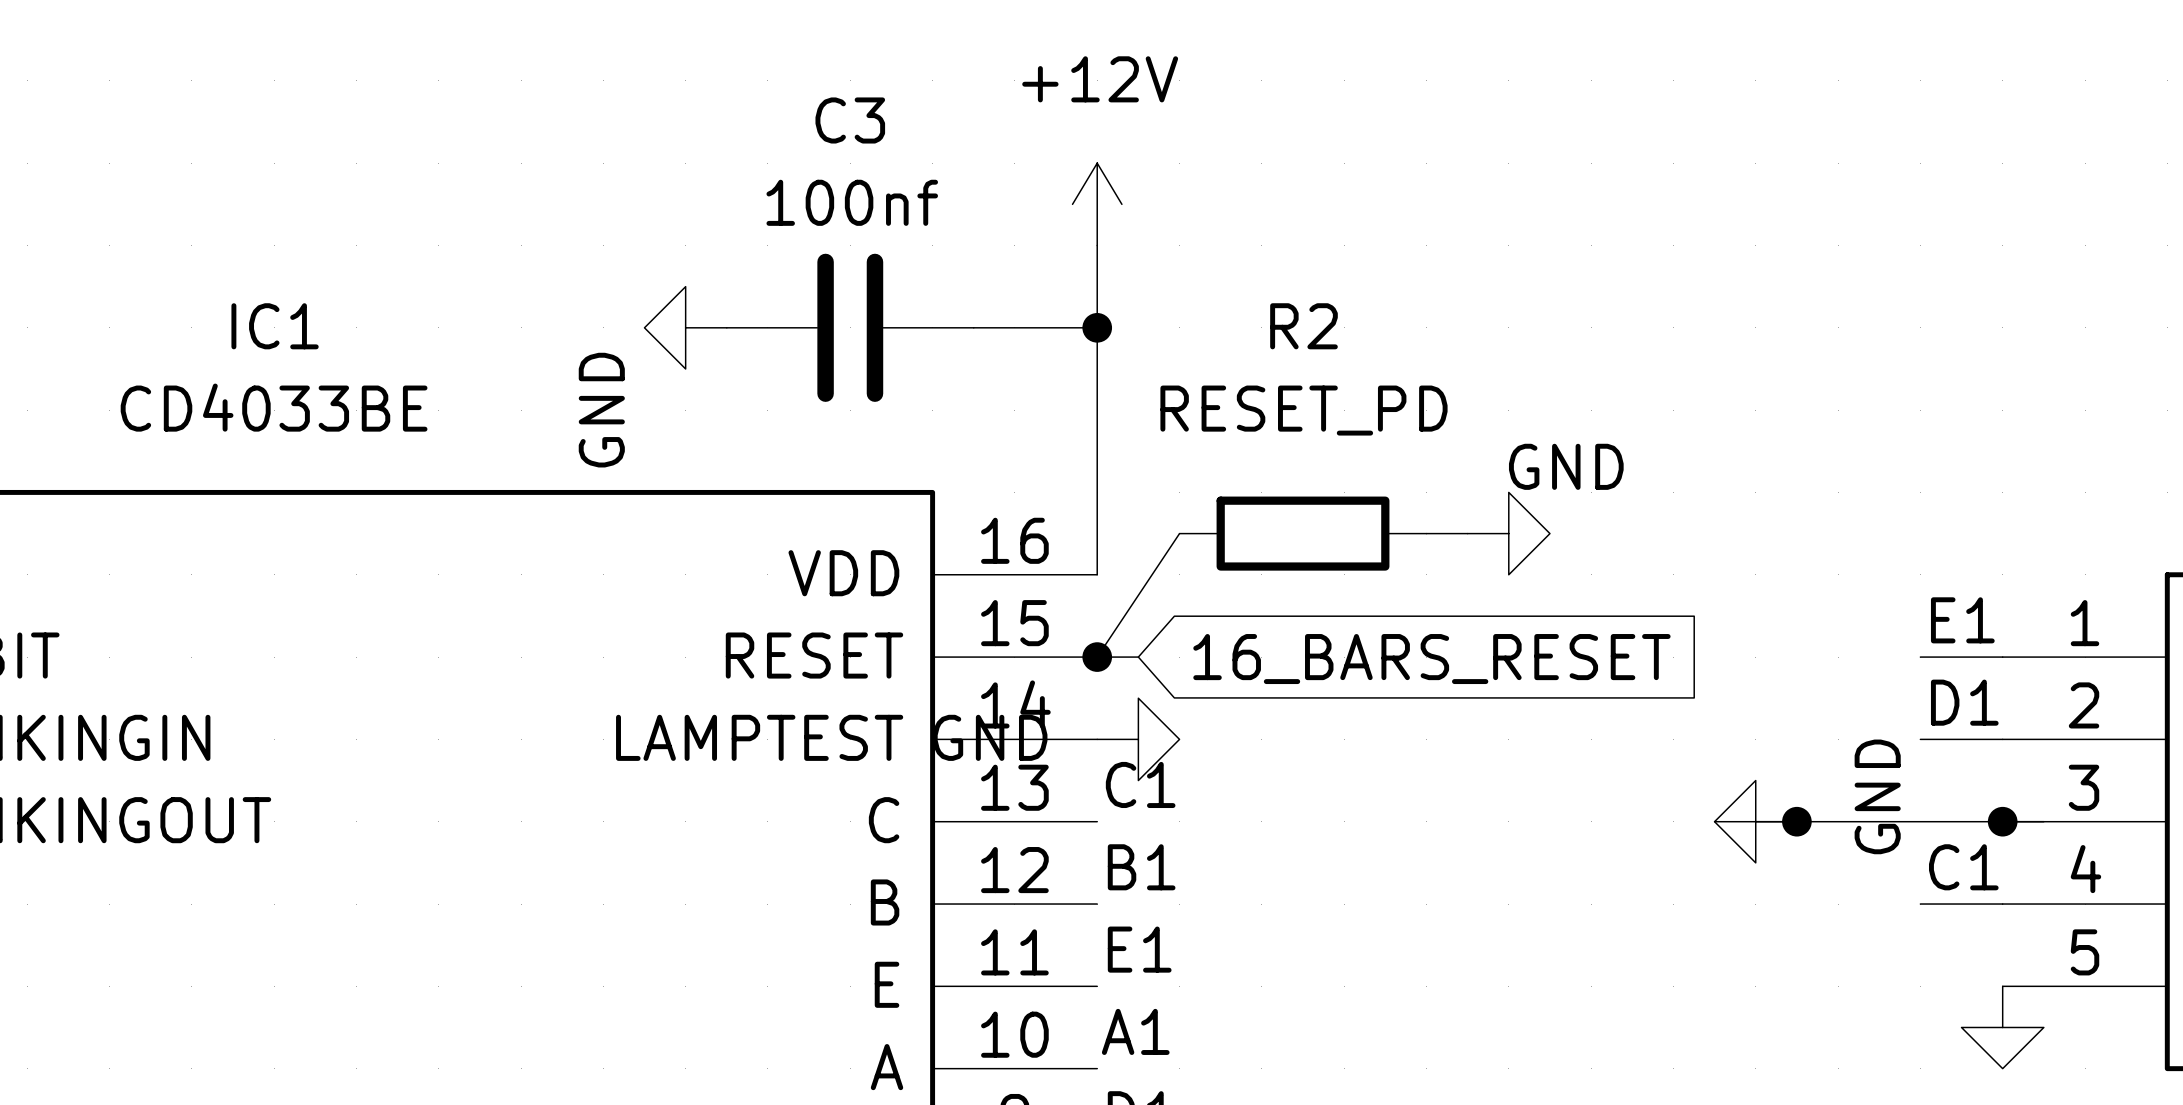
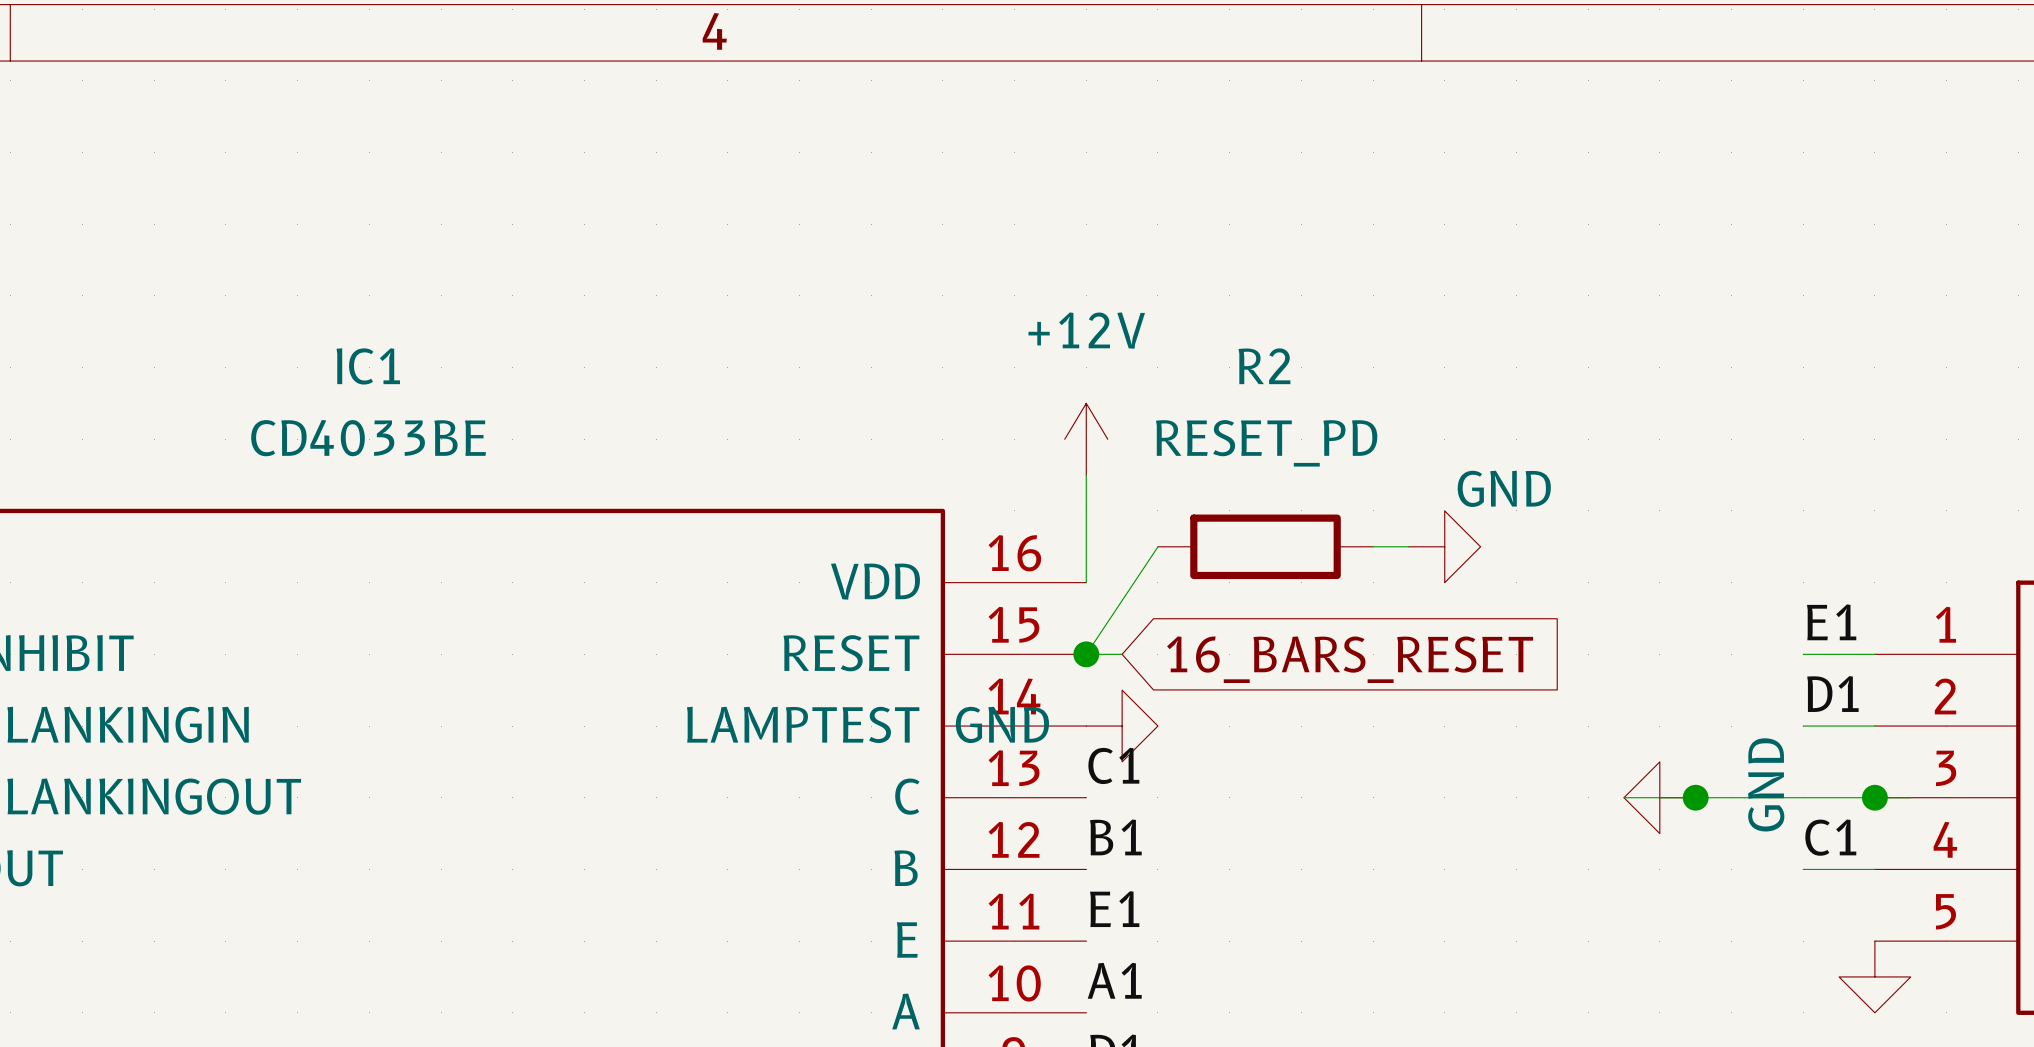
power symbol position: +12V (1097, 204) -> +12V (1086, 439)
wire: (1097, 245) (1097, 451) -> none
power symbol: GND (685, 327) -> none
C3: 100nf (850, 327) -> none
wire: (973, 327) (1097, 327) -> none
junction: (1097, 327) -> none

